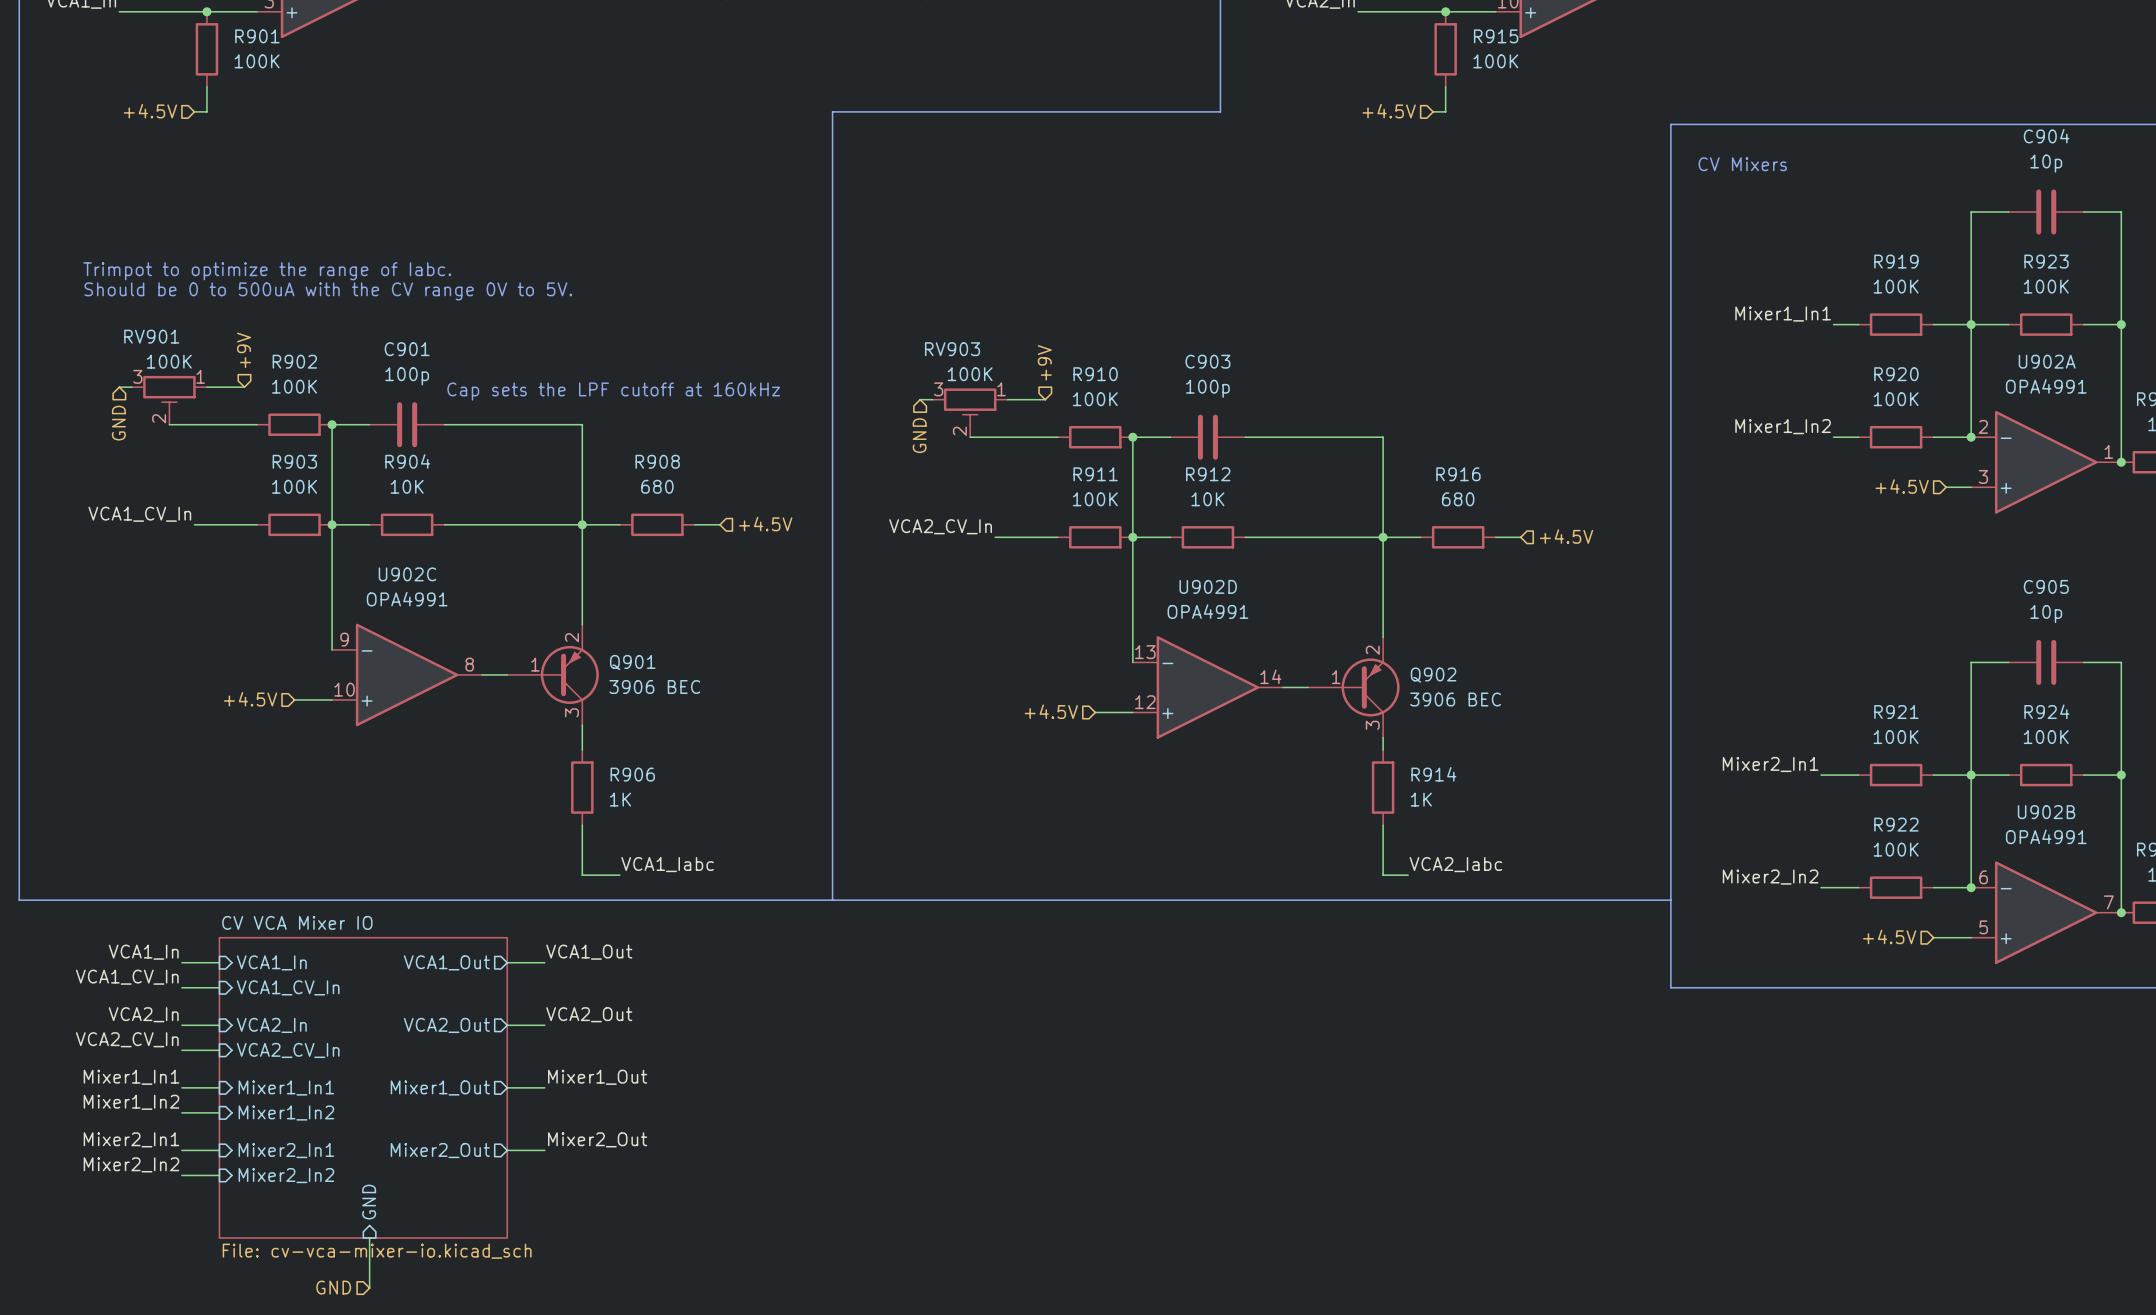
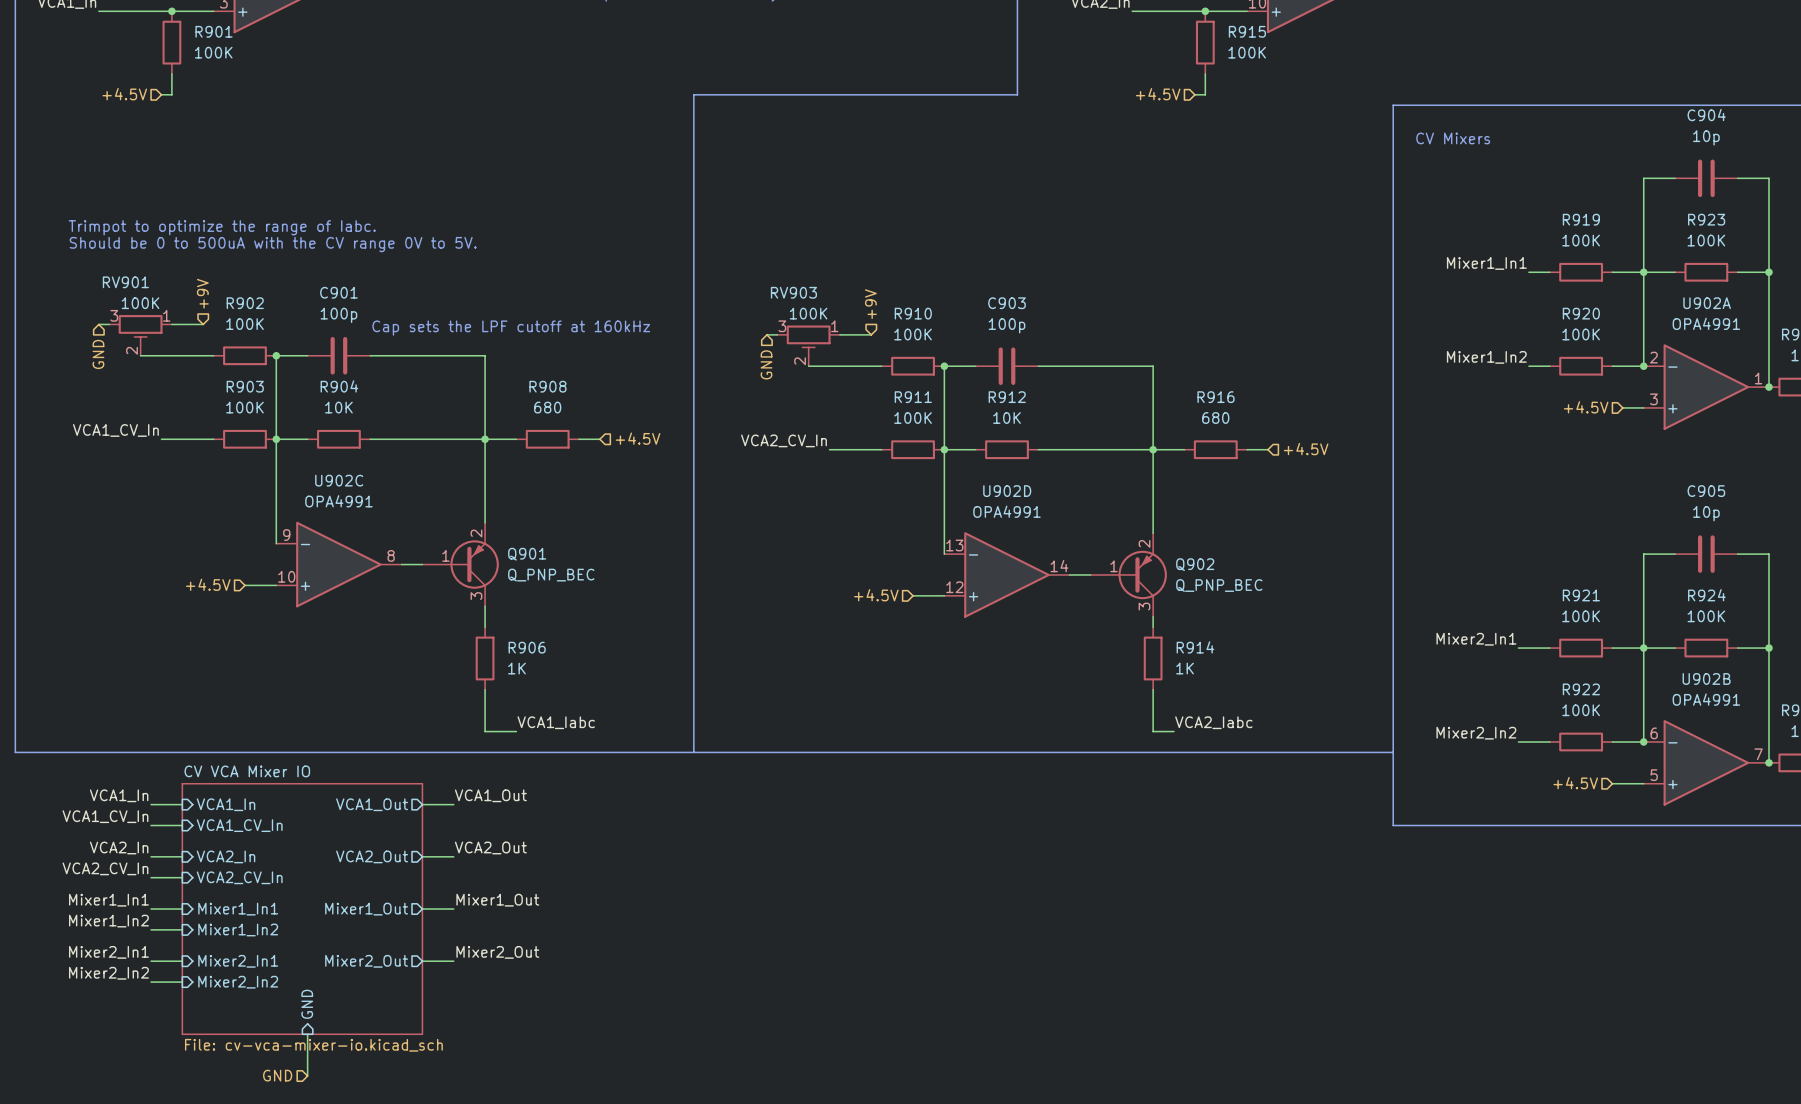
Q901 value: 3906 BEC (654, 687) -> Q_PNP_BEC (551, 575)
Q902 value: 3906 BEC (1455, 699) -> Q_PNP_BEC (1219, 585)

